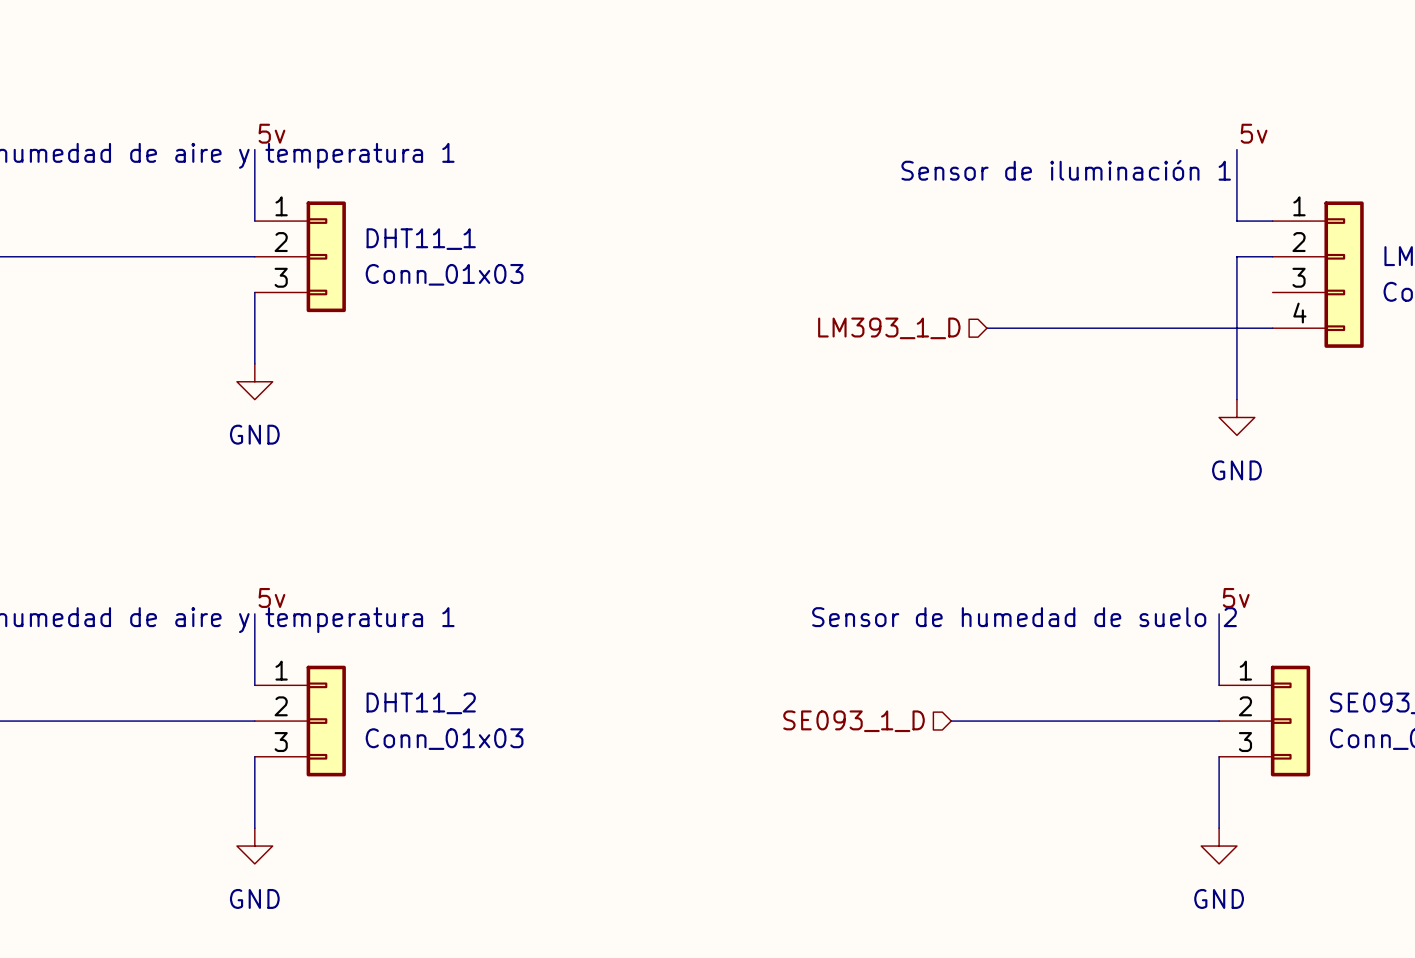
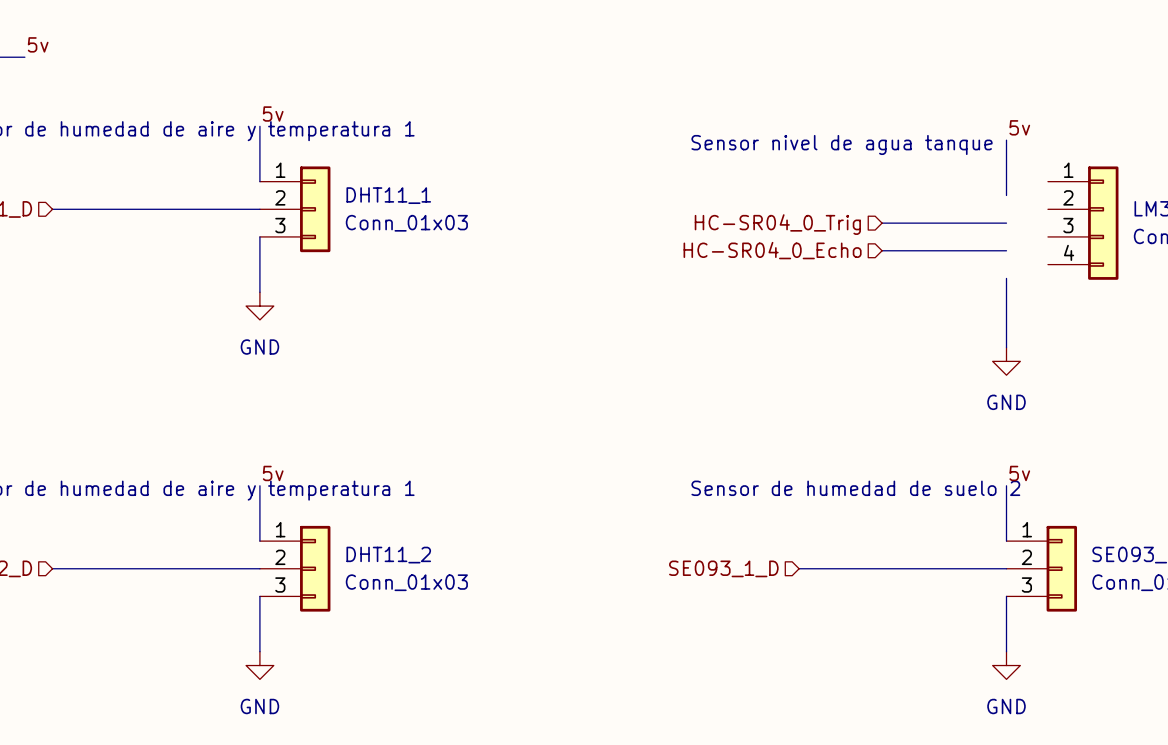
label position: 5v (1254, 133) -> 5v (1019, 127)
wire: (1236, 149) (1236, 221) (1272, 221) -> none
wire: none -> (1006, 140) (1006, 195)
text: Sensor de iluminación 1 (1066, 170) -> none
text: none -> Sensor nivel de agua tanque (842, 144)
wire: (1272, 256) (1236, 256) (1236, 399) -> none
wire: none -> (882, 223) (1006, 223)
hierarchical label: none -> HC-SR04_0_Trig (777, 224)
hierarchical label: none -> HC-SR04_0_Echo (772, 250)
wire: none -> (882, 250) (1006, 250)
hierarchical label: LM393_1_D (889, 328) -> none
wire: (986, 328) (1272, 328) -> none
wire: none -> (1006, 278) (1006, 347)
power symbol position: GND (1236, 417) -> GND (1006, 361)

